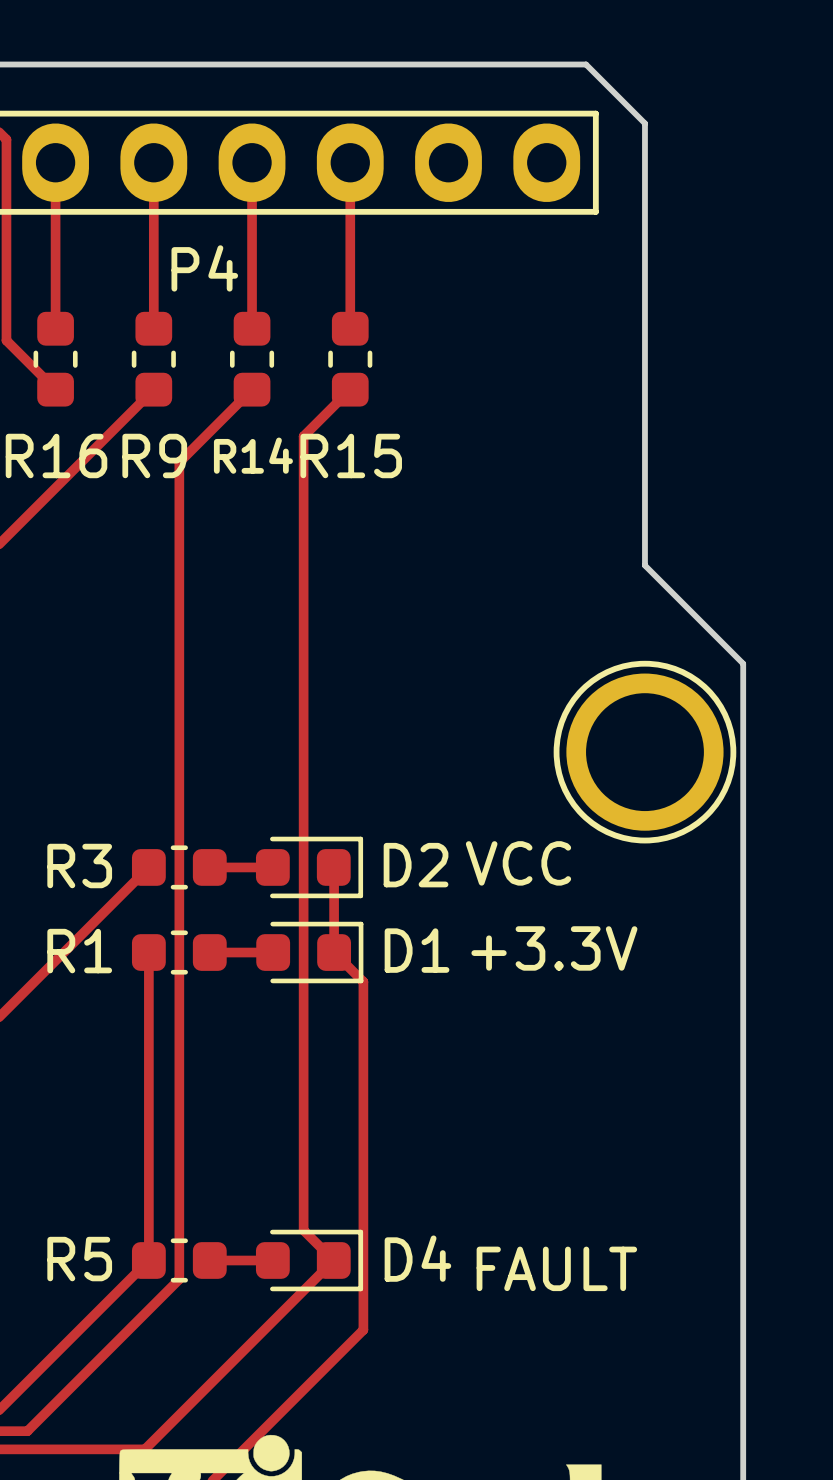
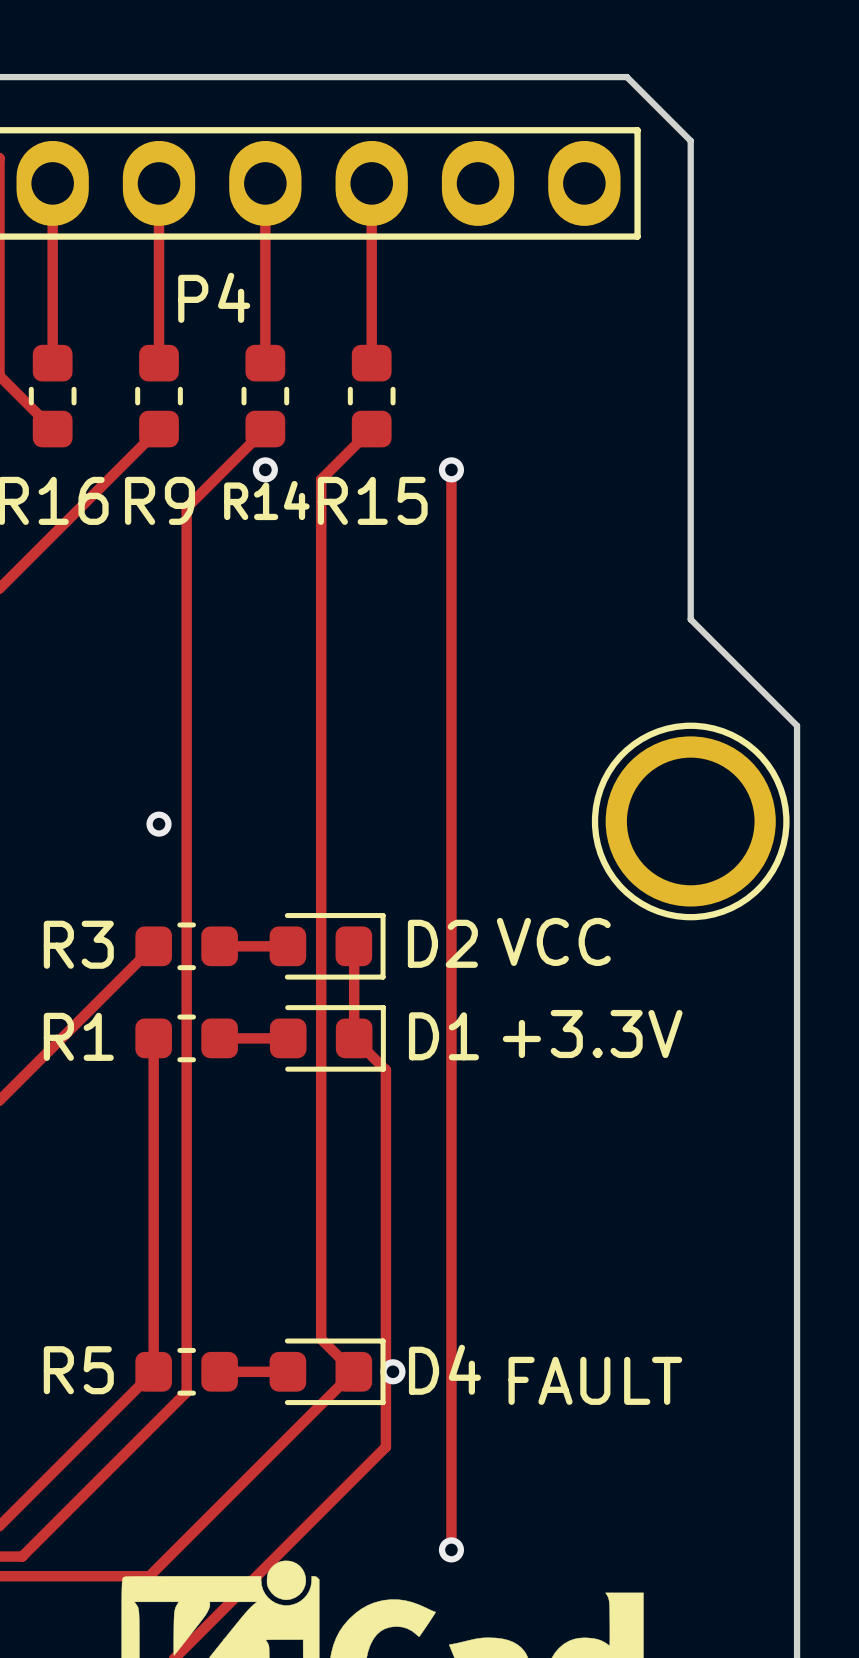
via: none -> (265, 469)
track: none -> (451, 469) (451, 1549)
via: none -> (451, 469)
via: none -> (159, 824)
via: none -> (392, 1371)
via: none -> (451, 1549)

